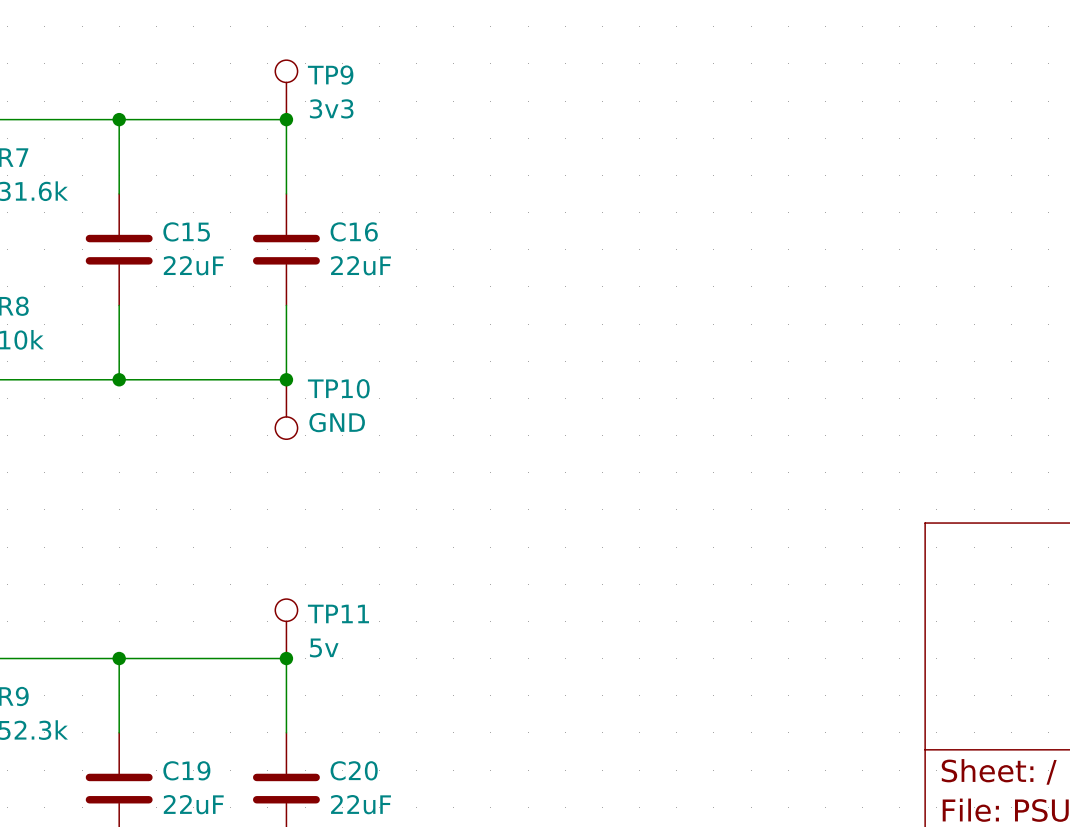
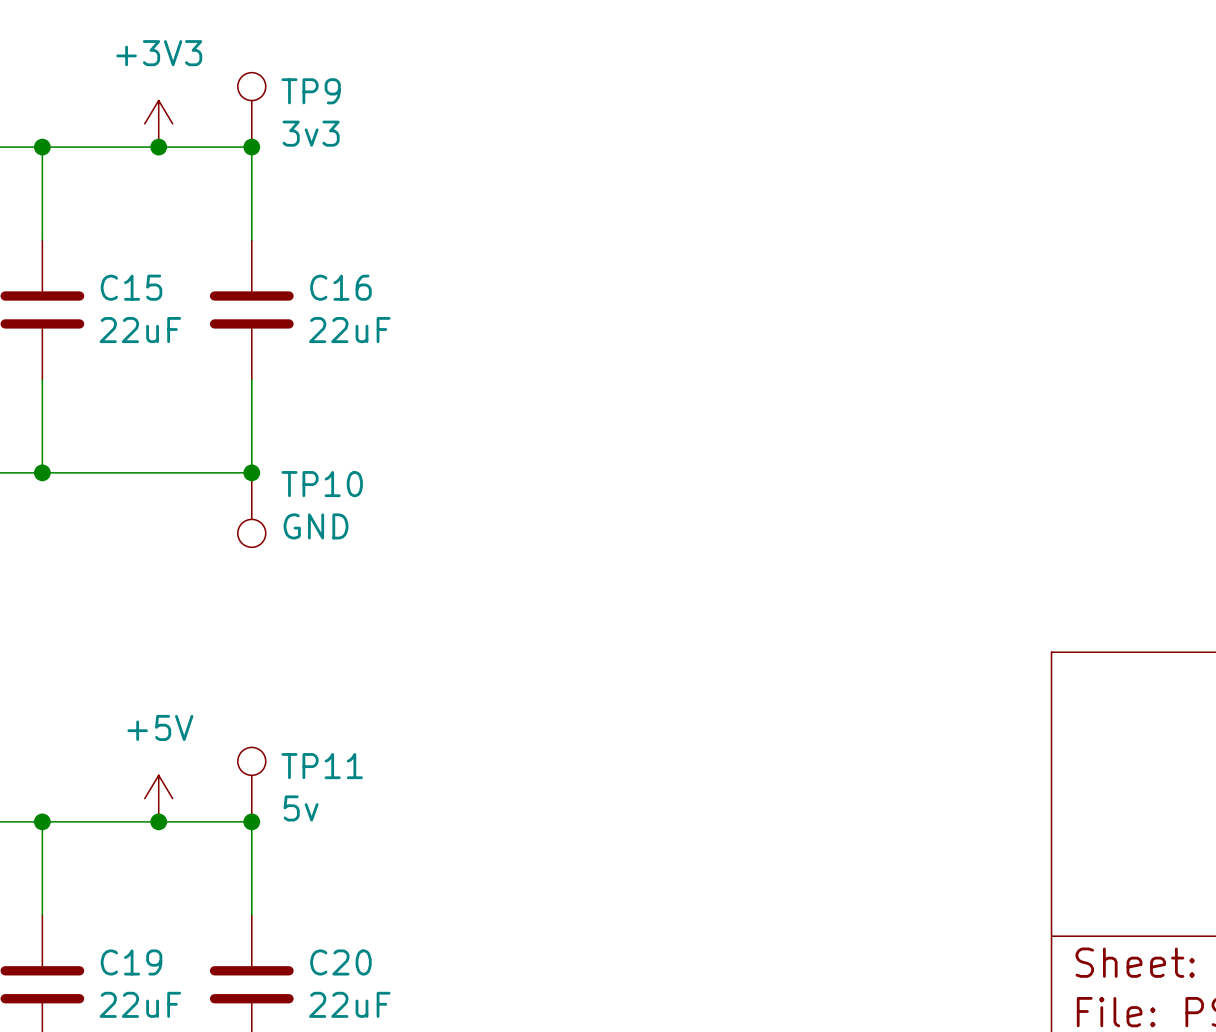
power symbol: none -> +3V3 (158, 123)
junction: none -> (158, 147)
power symbol: none -> +5V (158, 798)
junction: none -> (158, 821)

